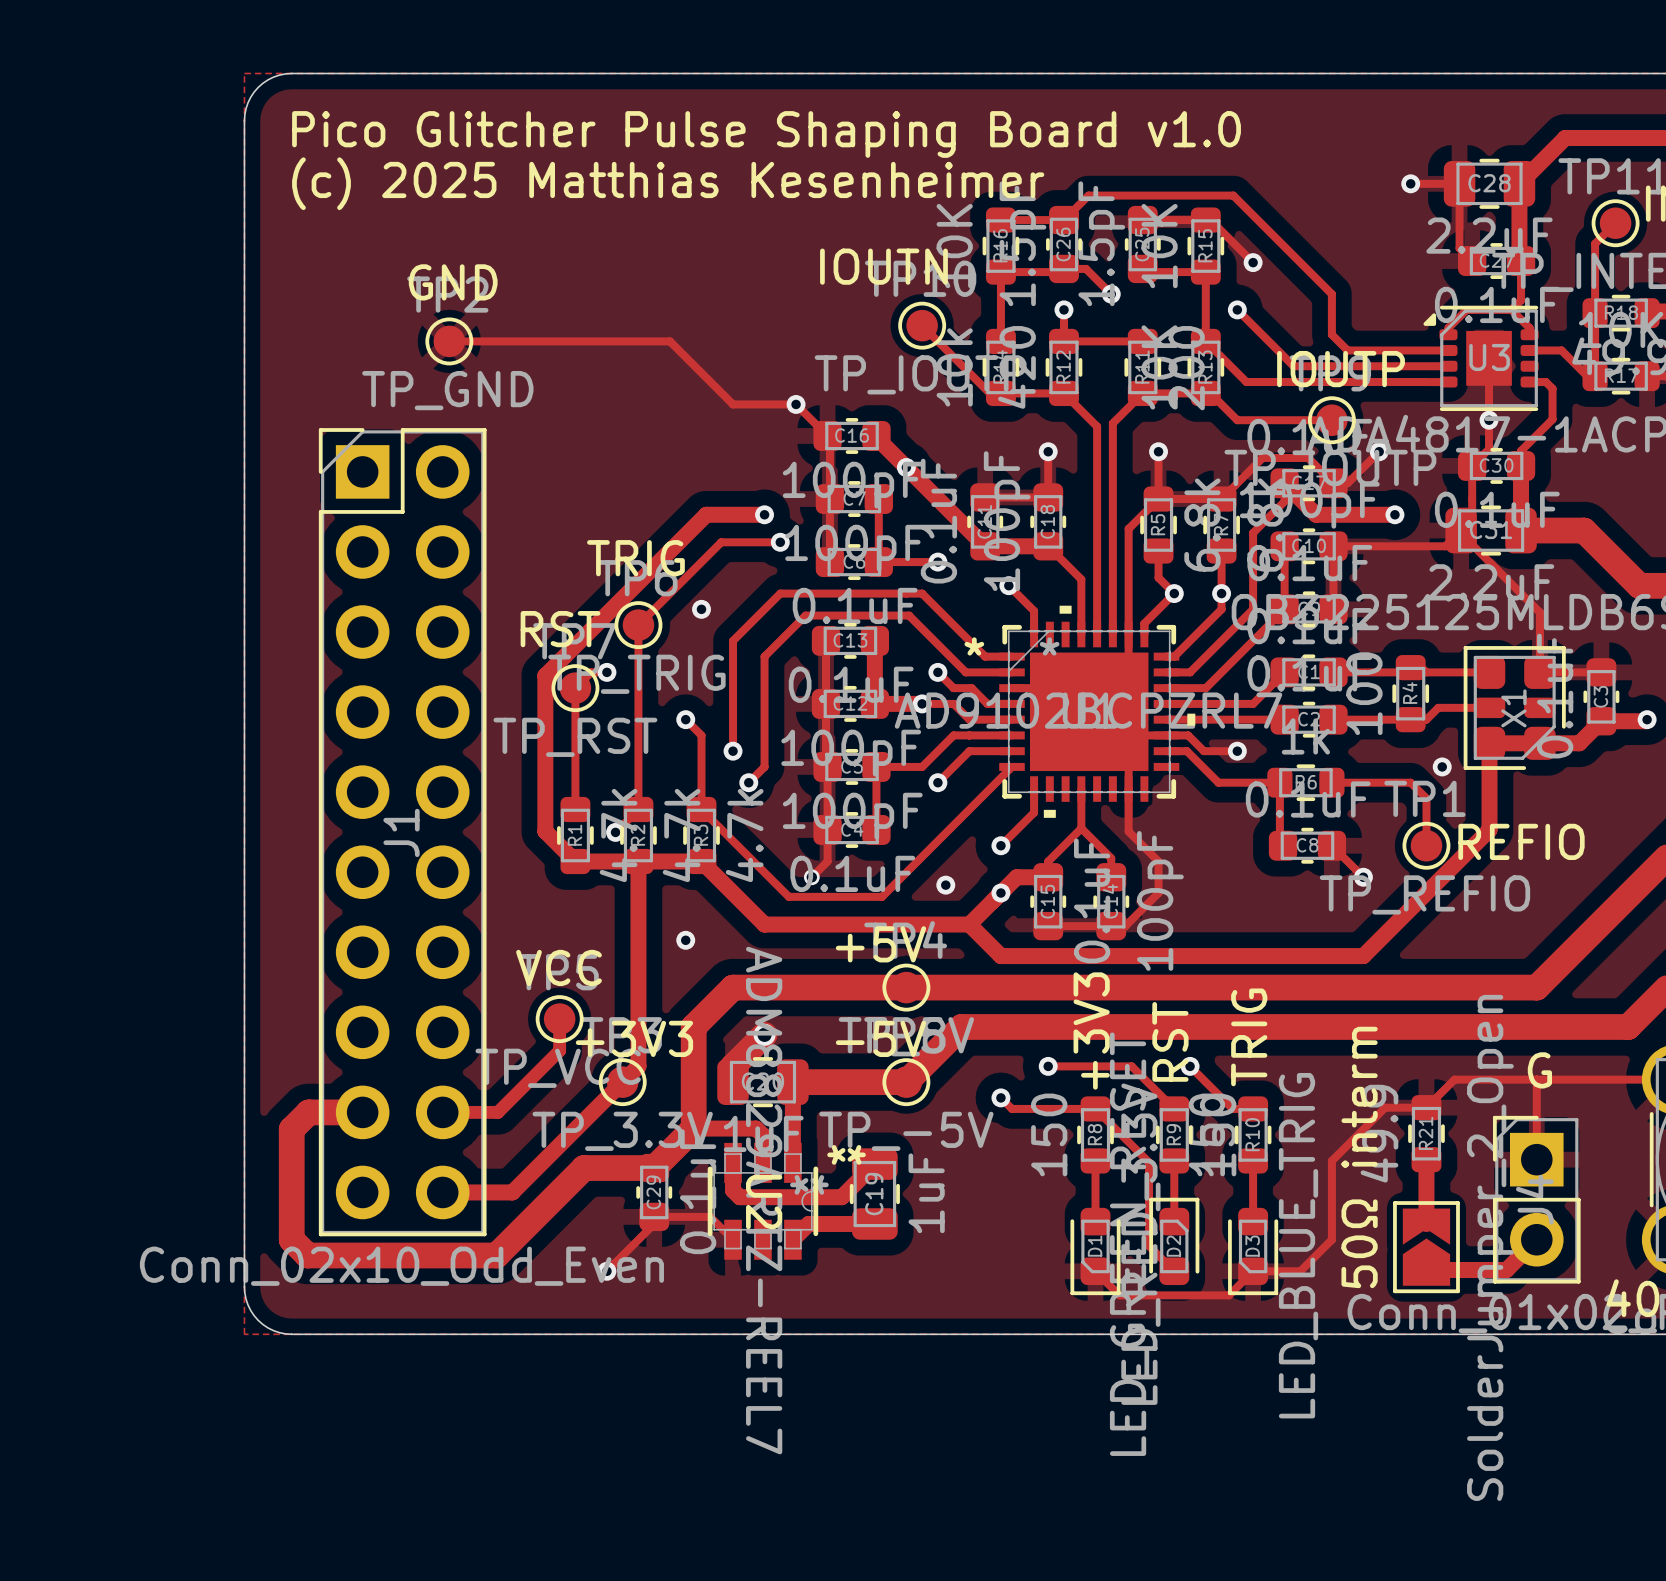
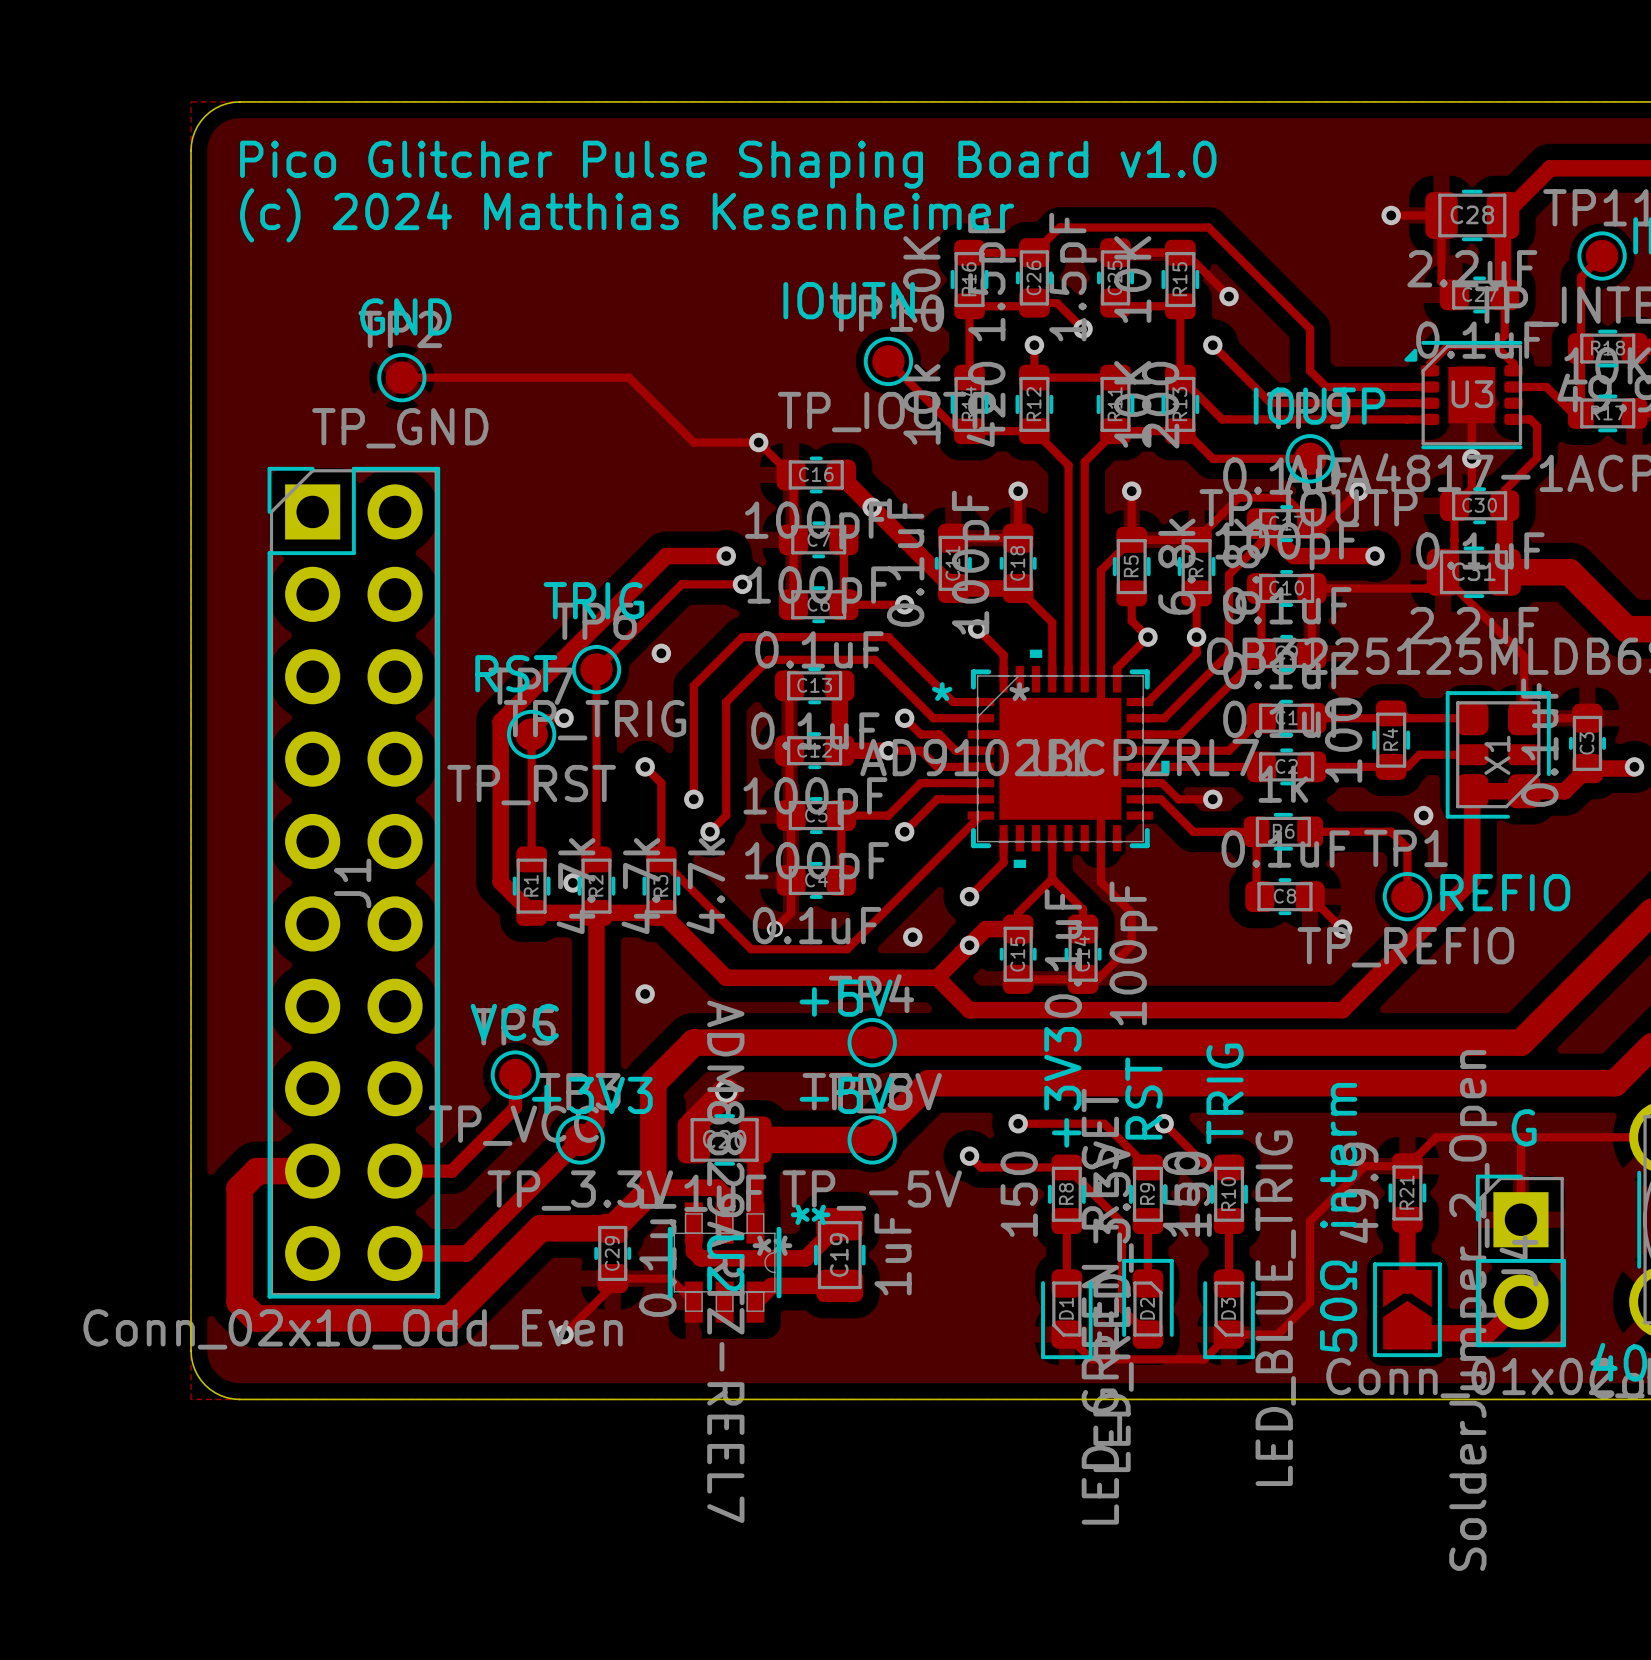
text: (c) 2025 Matthias Kesenheimer (668, 183) -> (c) 2024 Matthias Kesenheimer (627, 215)

